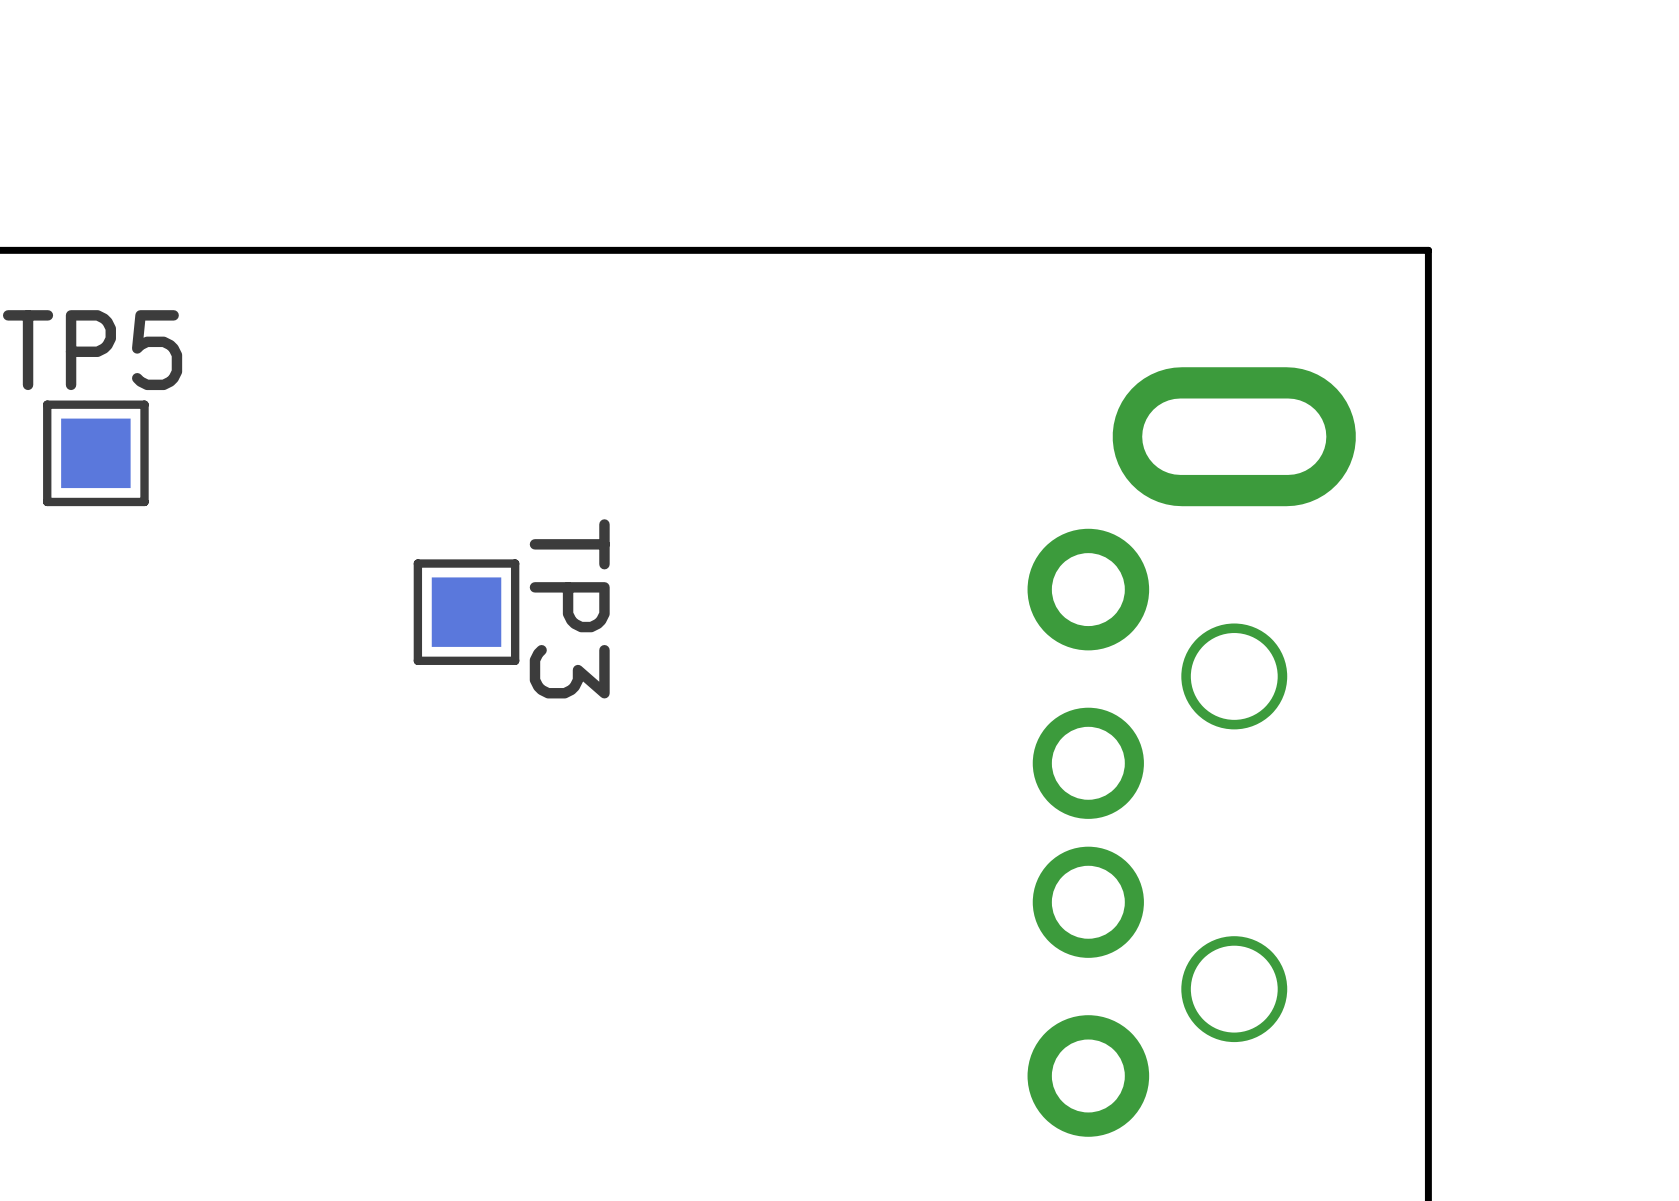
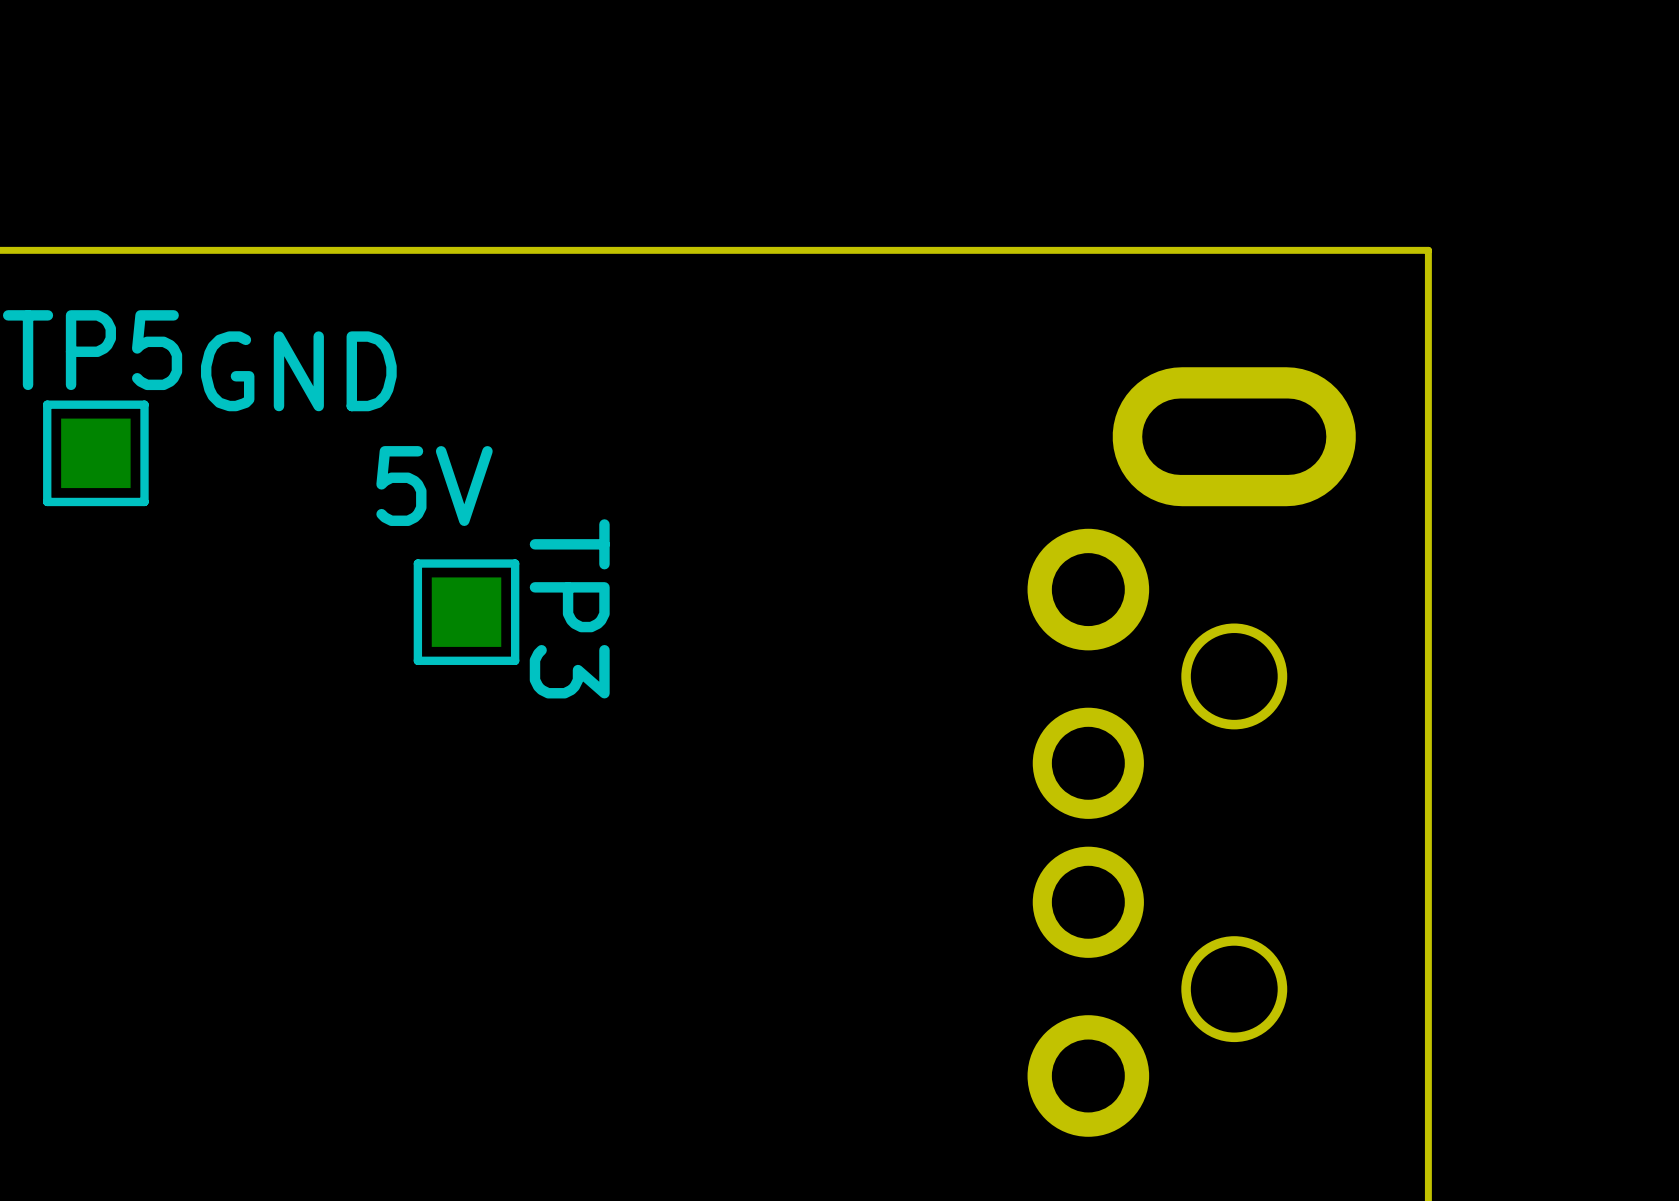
text: none -> GND (298, 371)
text: none -> 5V (434, 486)

